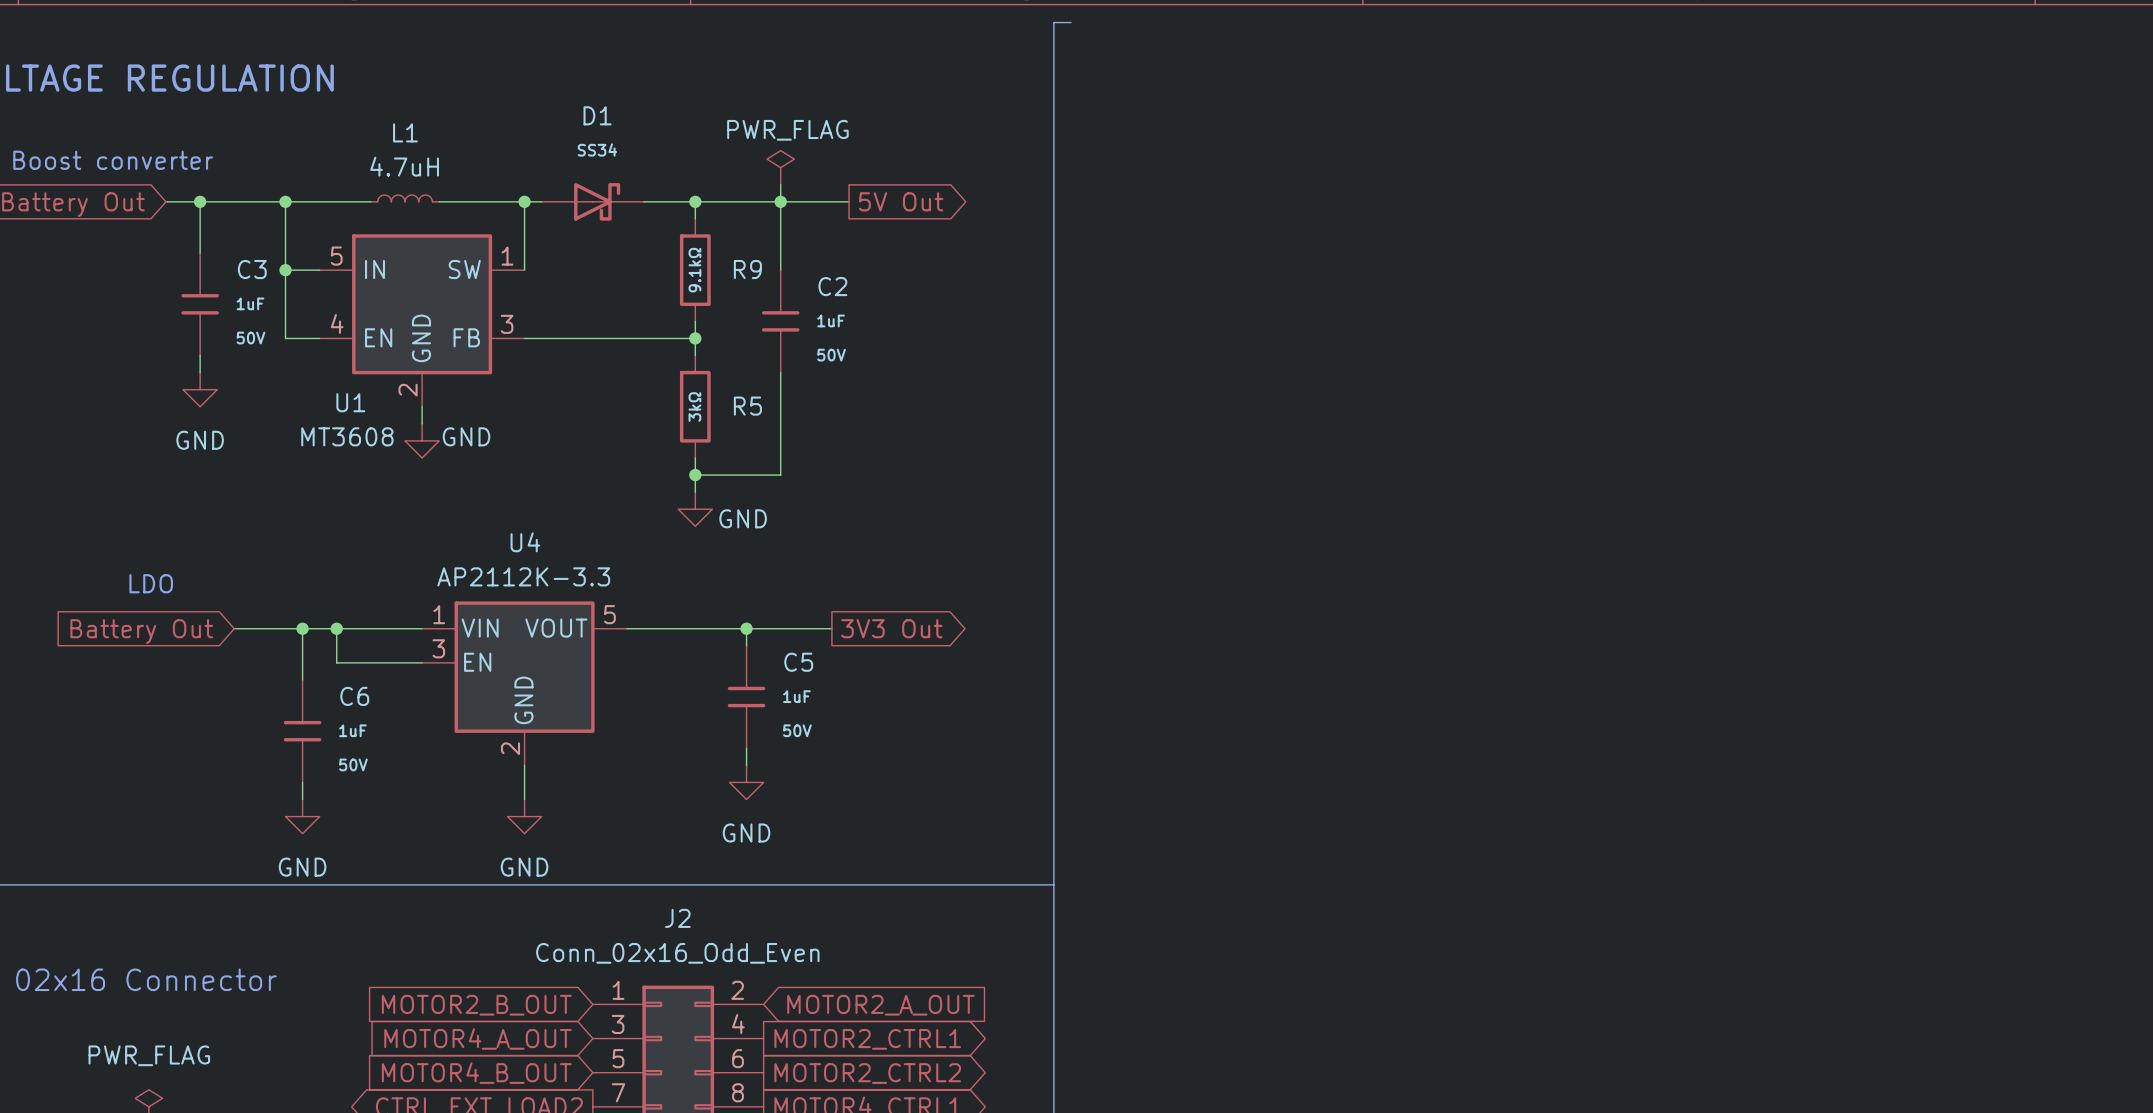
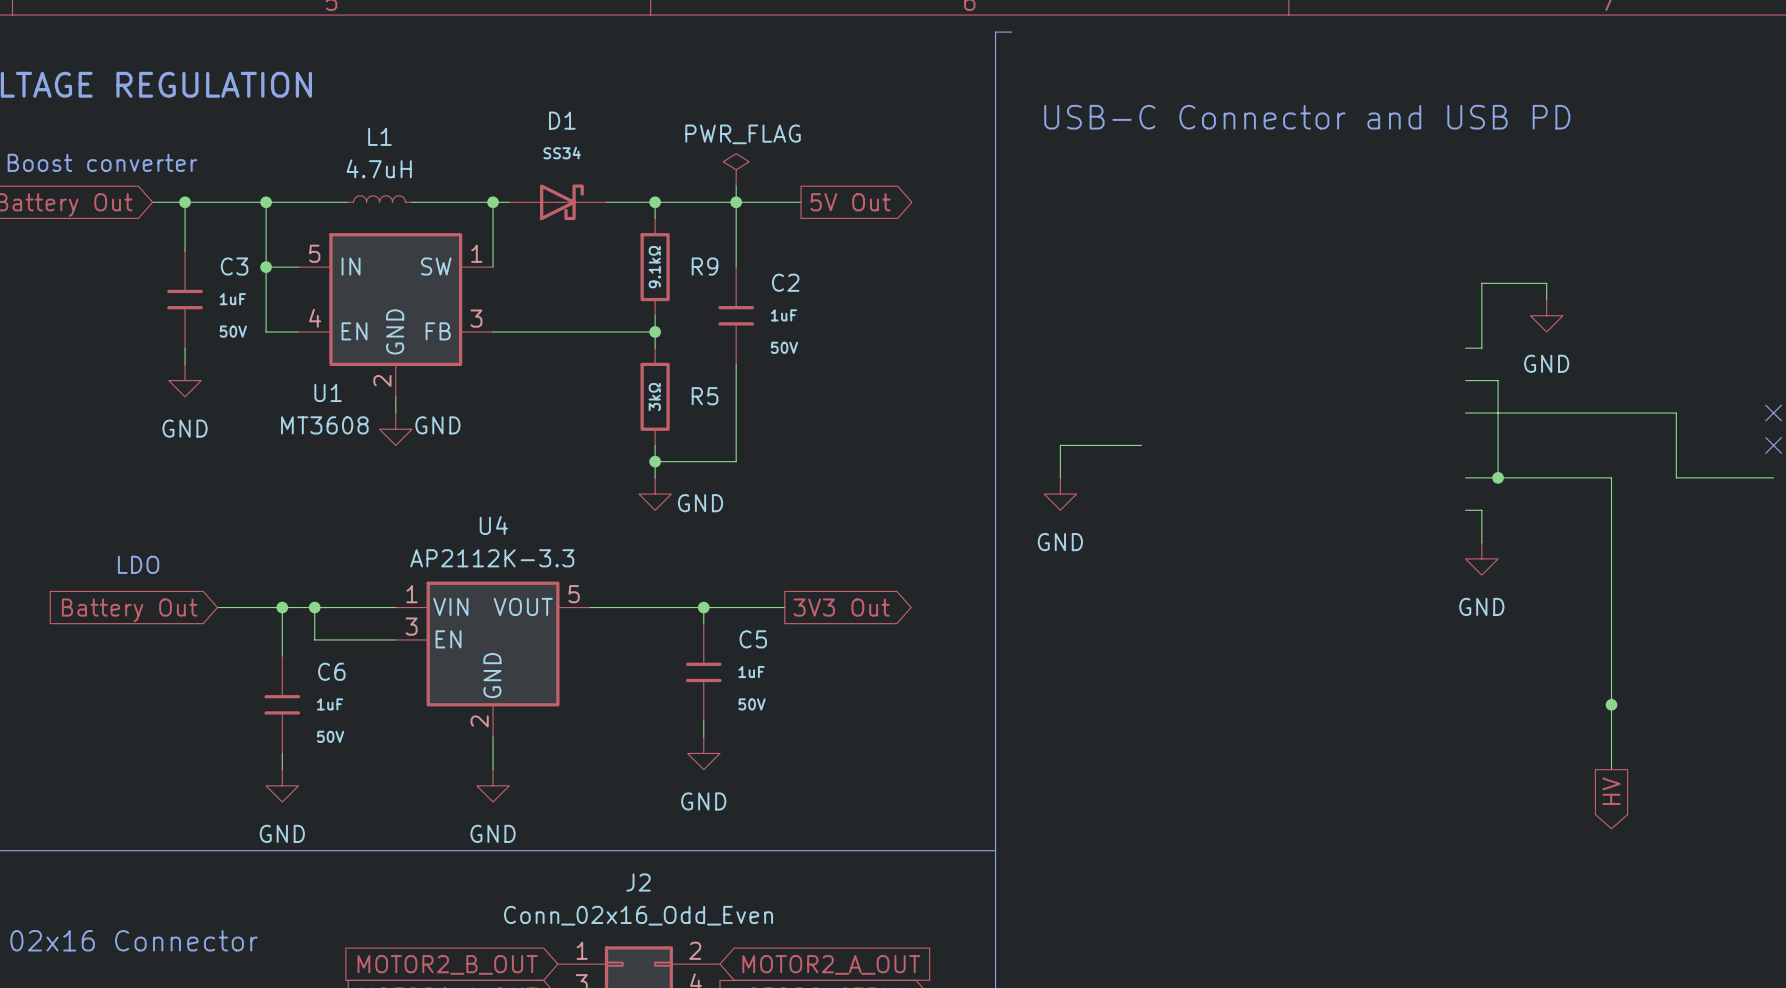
text: none -> USB-C Connector and USB PD (1307, 117)
wire: none -> (1546, 299) (1546, 283) (1481, 283) (1481, 348) (1465, 348)
power symbol: none -> GND (1546, 315)
wire: none -> (1465, 380) (1498, 380) (1498, 477)
wire: none -> (1465, 413) (1676, 413) (1676, 477) (1773, 477)
no-connect mark: none -> (1773, 413)
wire: none -> (1141, 445) (1060, 445) (1060, 477)
no-connect mark: none -> (1773, 445)
wire: none -> (1465, 477) (1611, 477) (1611, 769)
junction: none -> (1498, 477)
power symbol: none -> GND (1060, 494)
wire: none -> (1465, 510) (1481, 510) (1481, 542)
power symbol: none -> GND (1481, 558)
junction: none -> (1611, 704)
global label: none -> HV (1611, 791)

